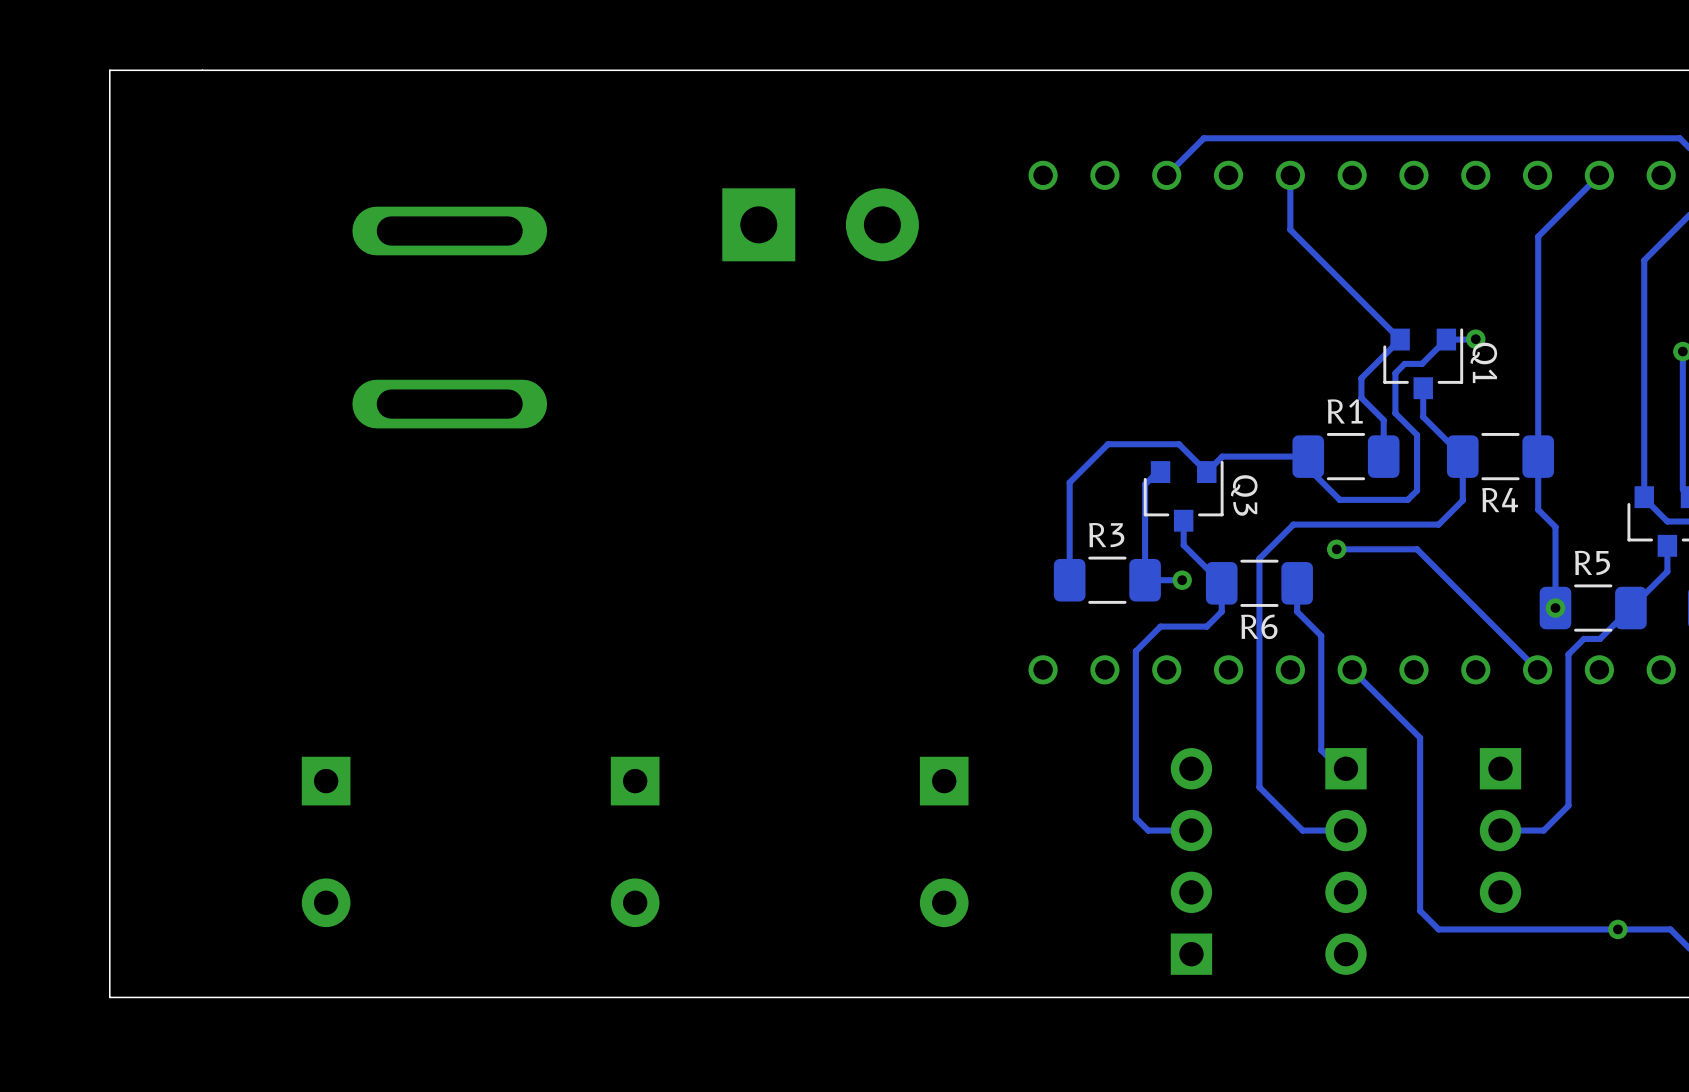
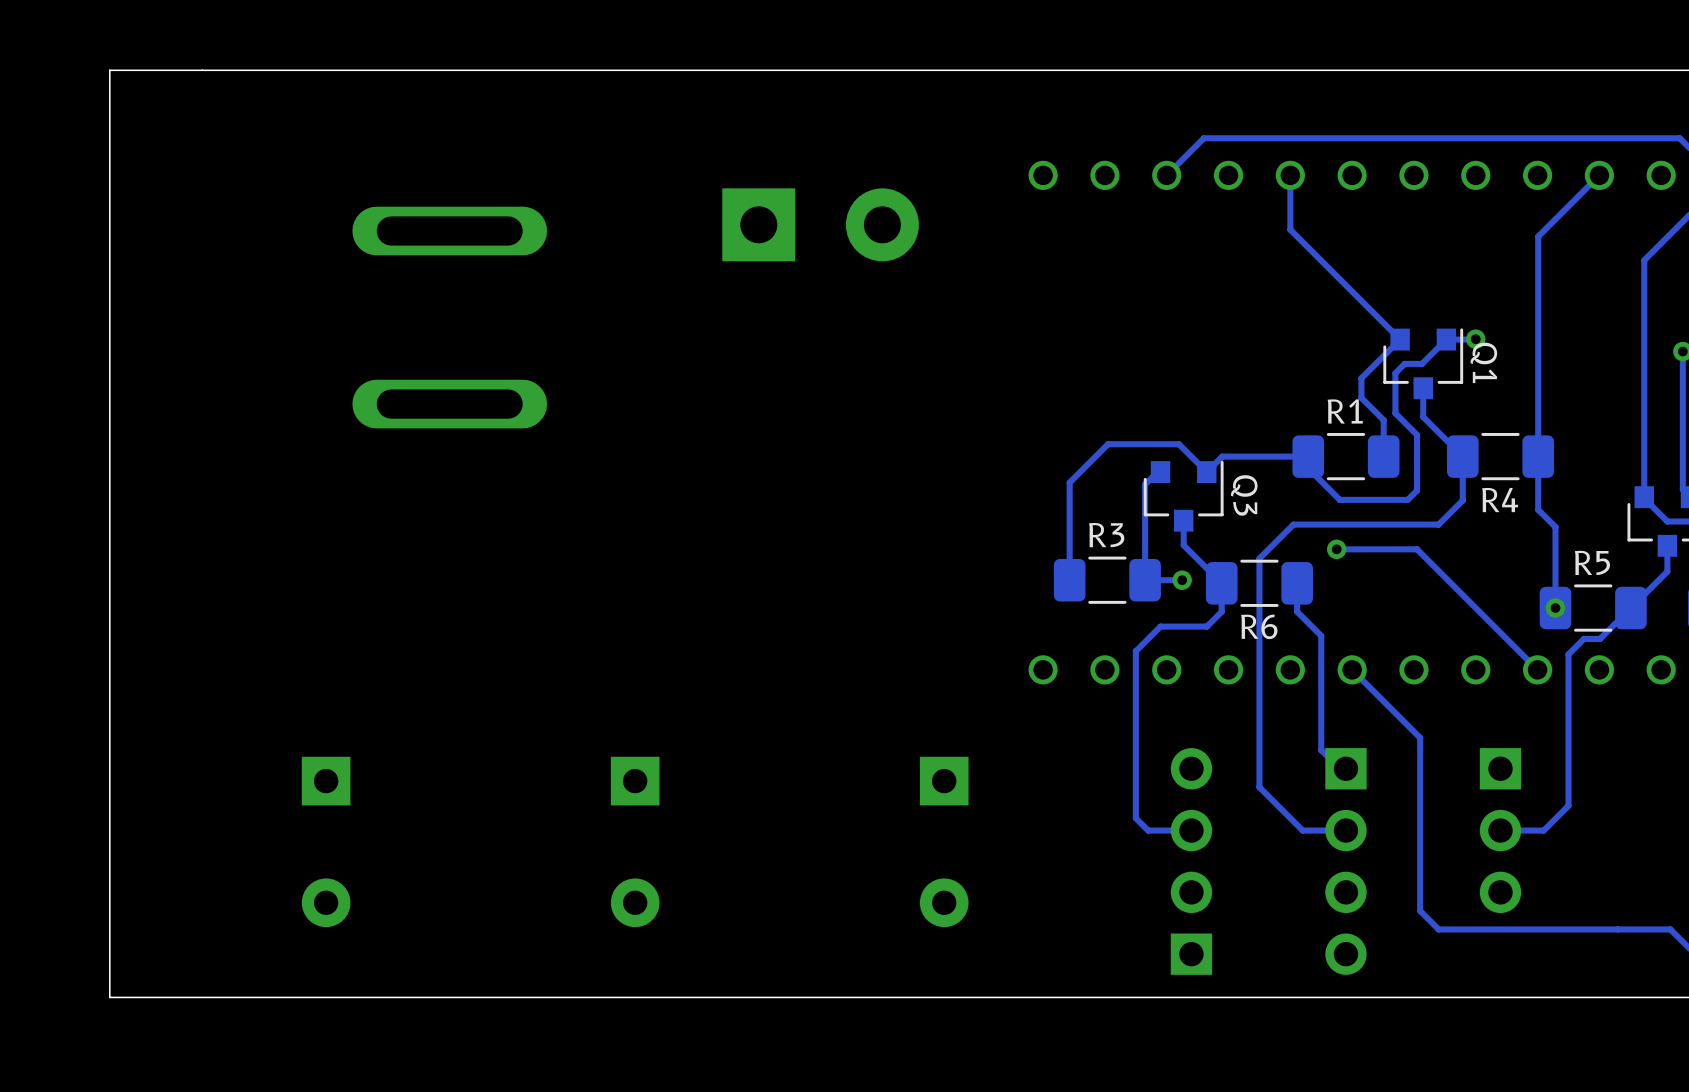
via: (1617, 929) -> none

